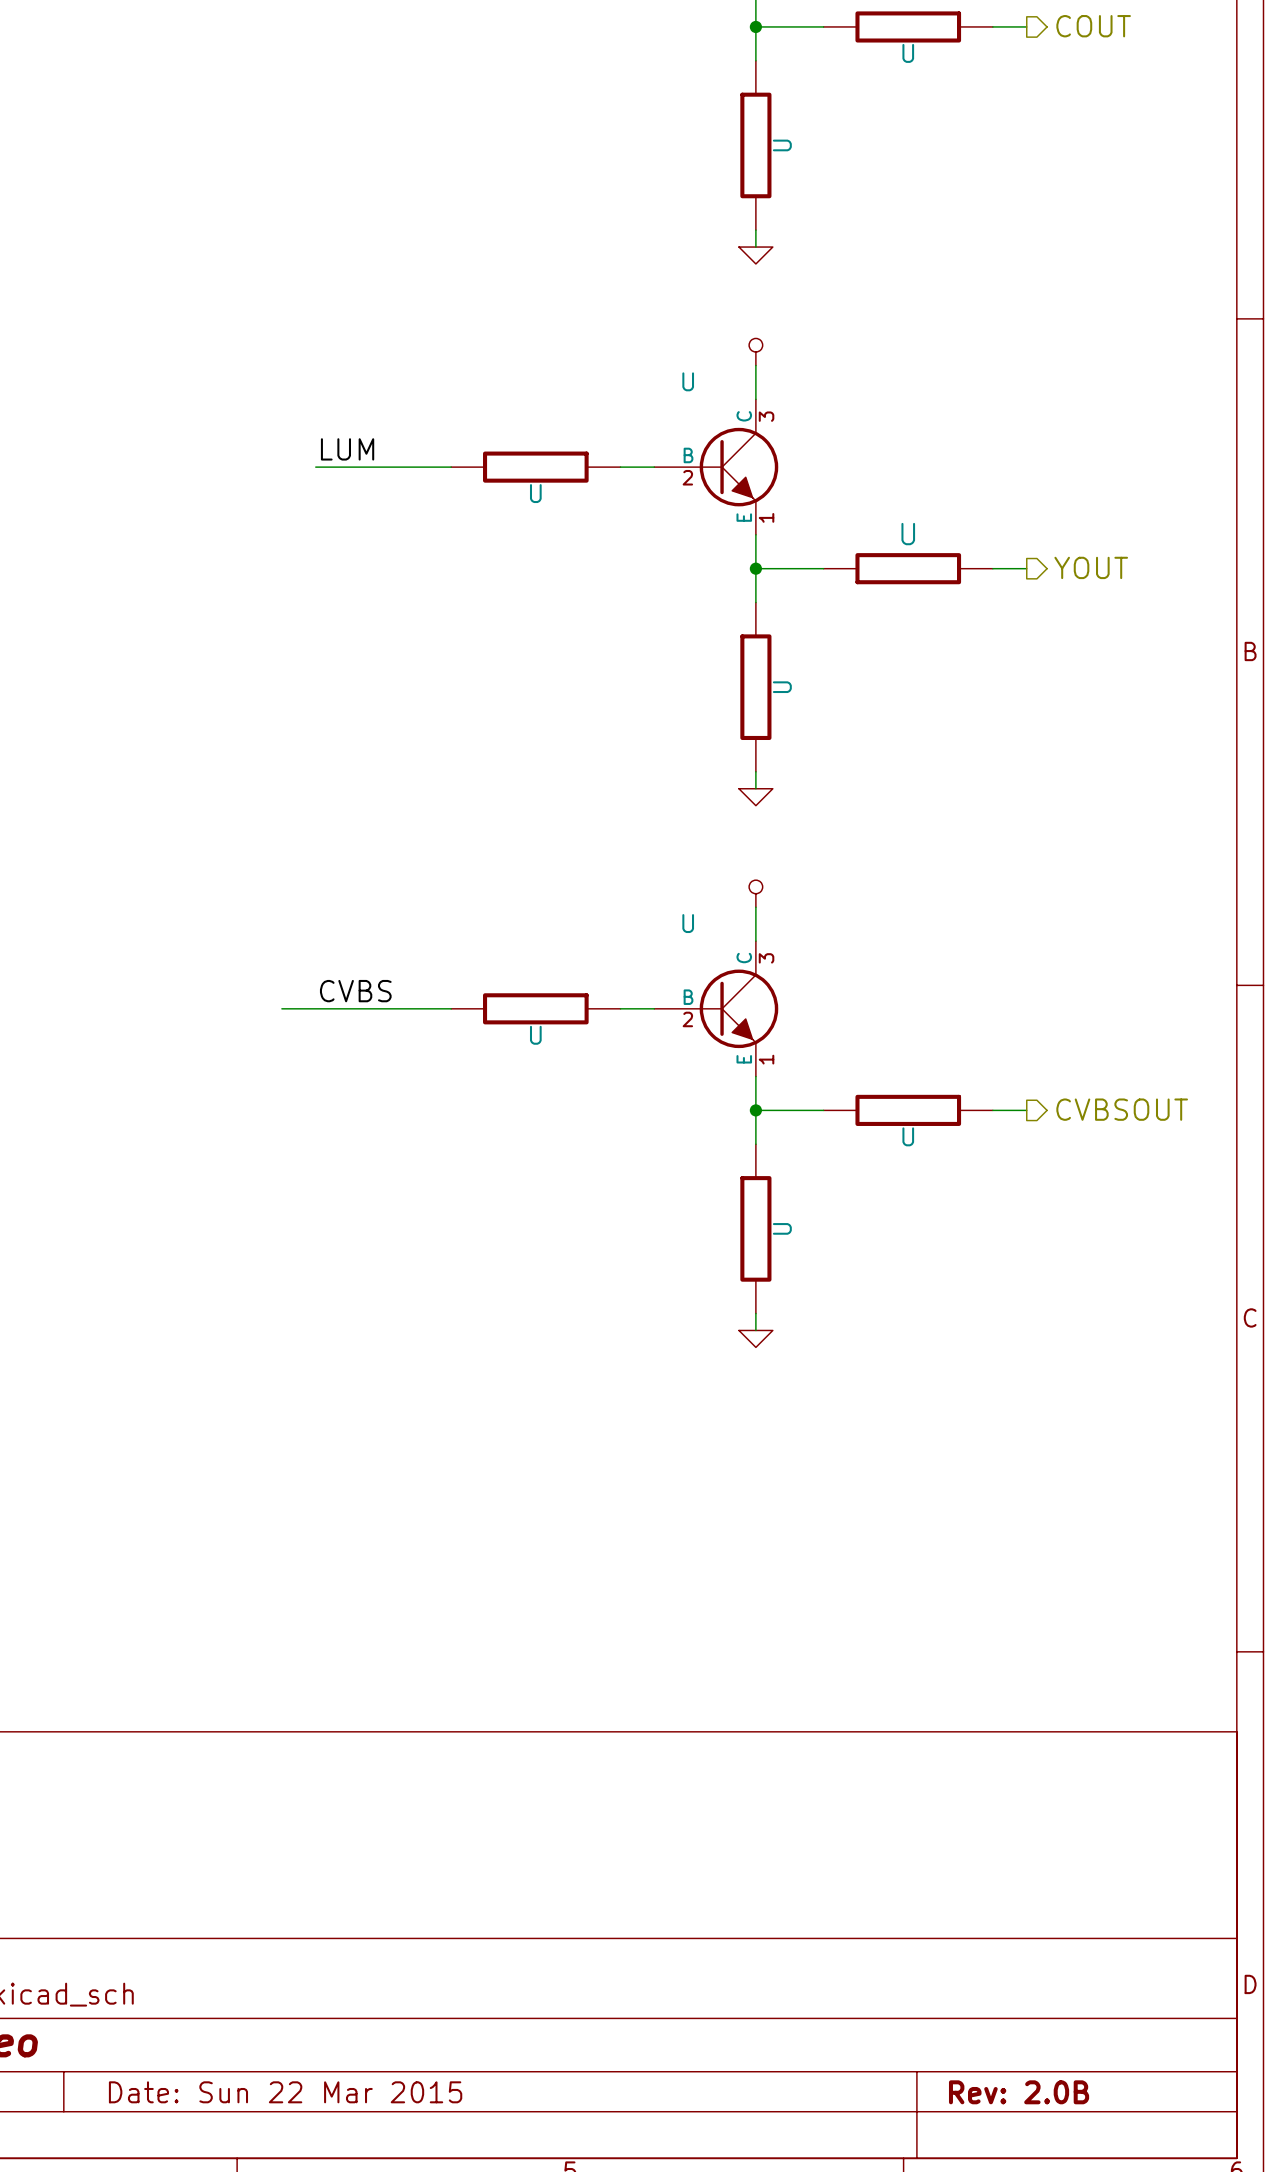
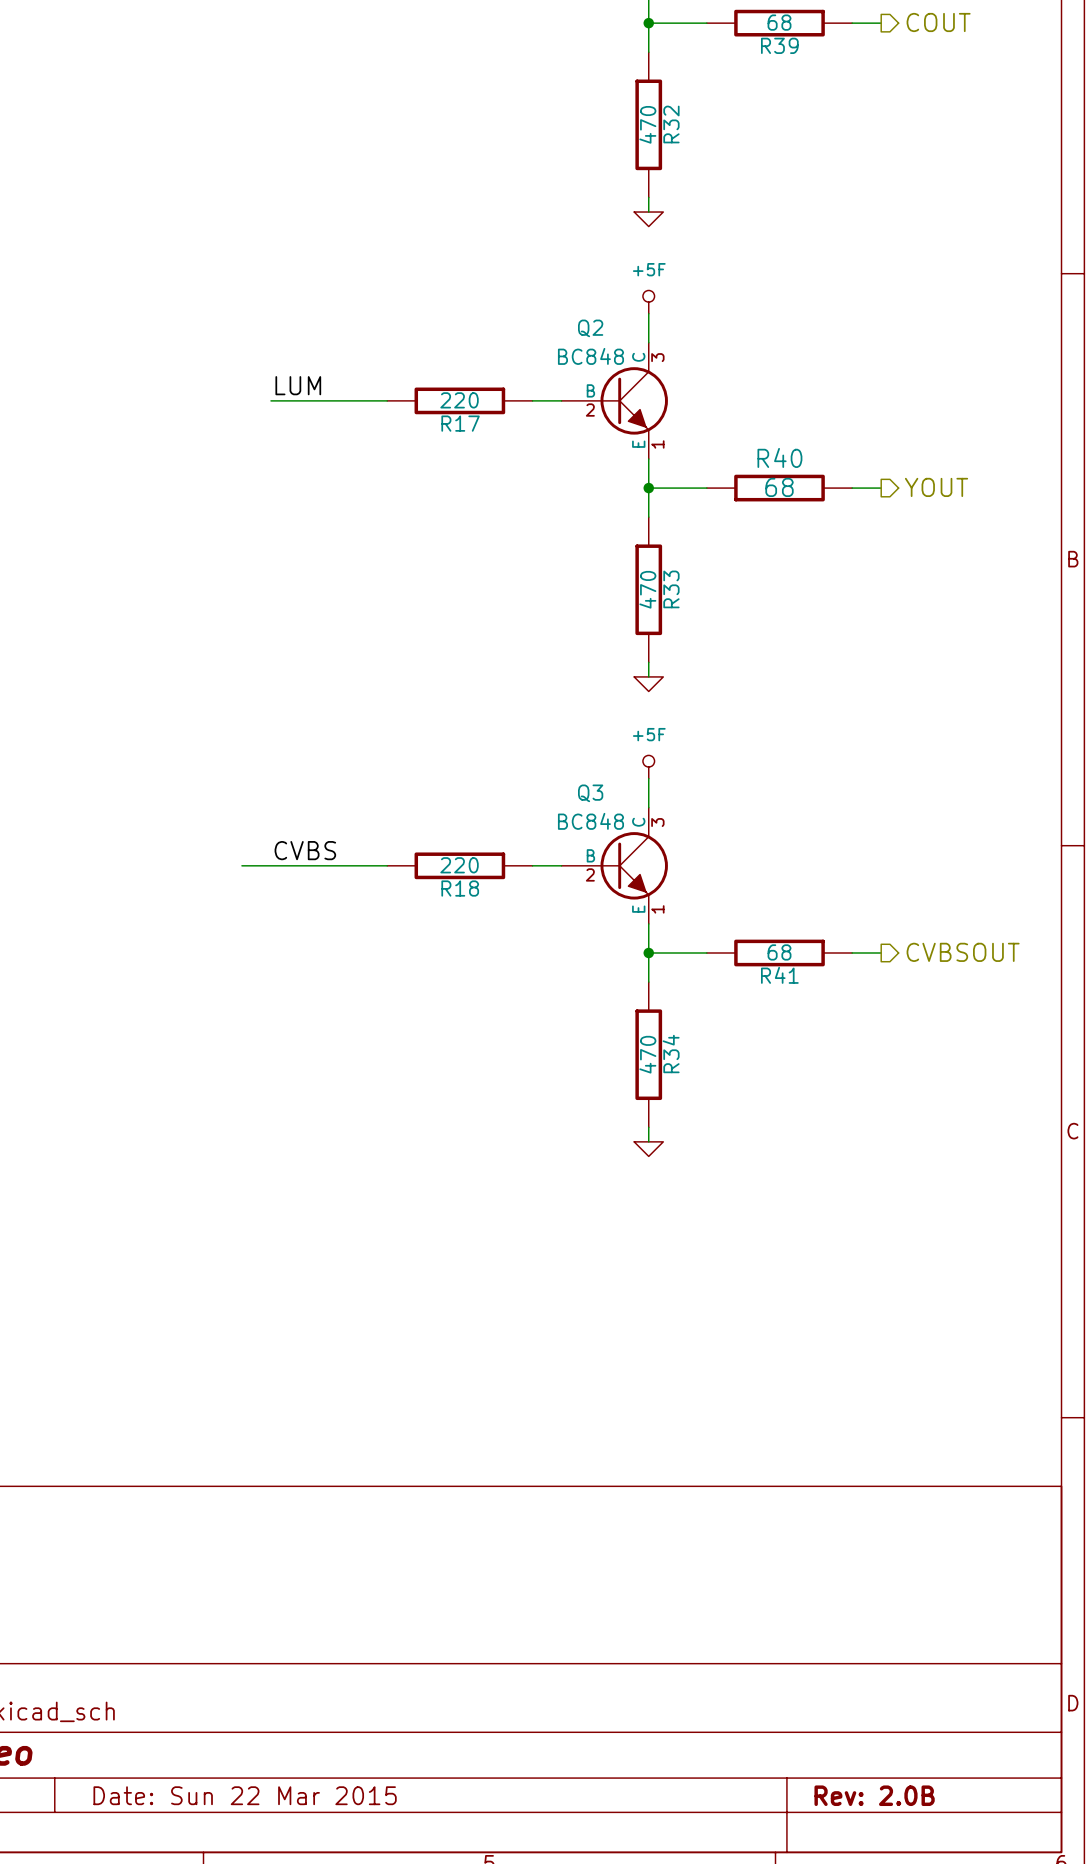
U value: none -> 68 (779, 22)
U name: U (908, 53) -> R39 (779, 45)
U value: none -> 470 (647, 124)
U name: U (782, 145) -> R32 (671, 124)
power symbol text: none -> +5F (649, 269)
U name: U (688, 381) -> Q2 (590, 328)
U value: none -> BC848 (590, 356)
U value: none -> 220 (459, 400)
U name: U (535, 493) -> R17 (460, 423)
U name: U (908, 534) -> R40 (779, 457)
U value: none -> 68 (779, 487)
U value: none -> 470 (647, 589)
U name: U (782, 687) -> R33 (671, 589)
power symbol text: none -> +5F (649, 734)
U name: U (688, 923) -> Q3 (590, 793)
U value: none -> BC848 (590, 821)
U value: none -> 220 (459, 865)
U name: U (535, 1035) -> R18 (460, 888)
U value: none -> 68 (779, 952)
U name: U (908, 1136) -> R41 (779, 975)
U value: none -> 470 (647, 1054)
U name: U (782, 1228) -> R34 (671, 1054)

